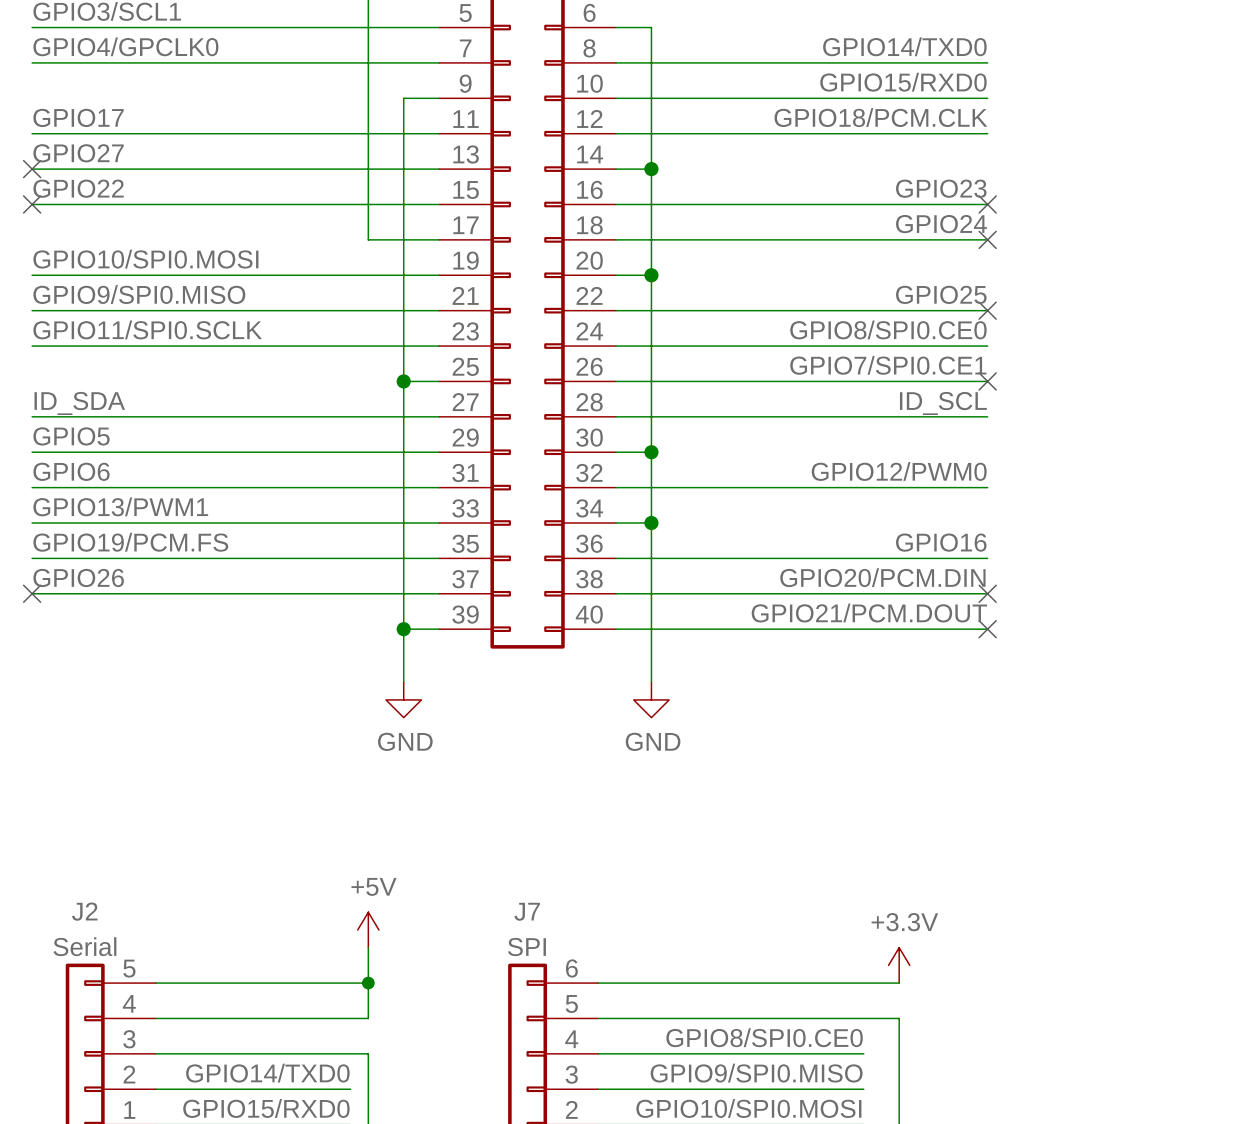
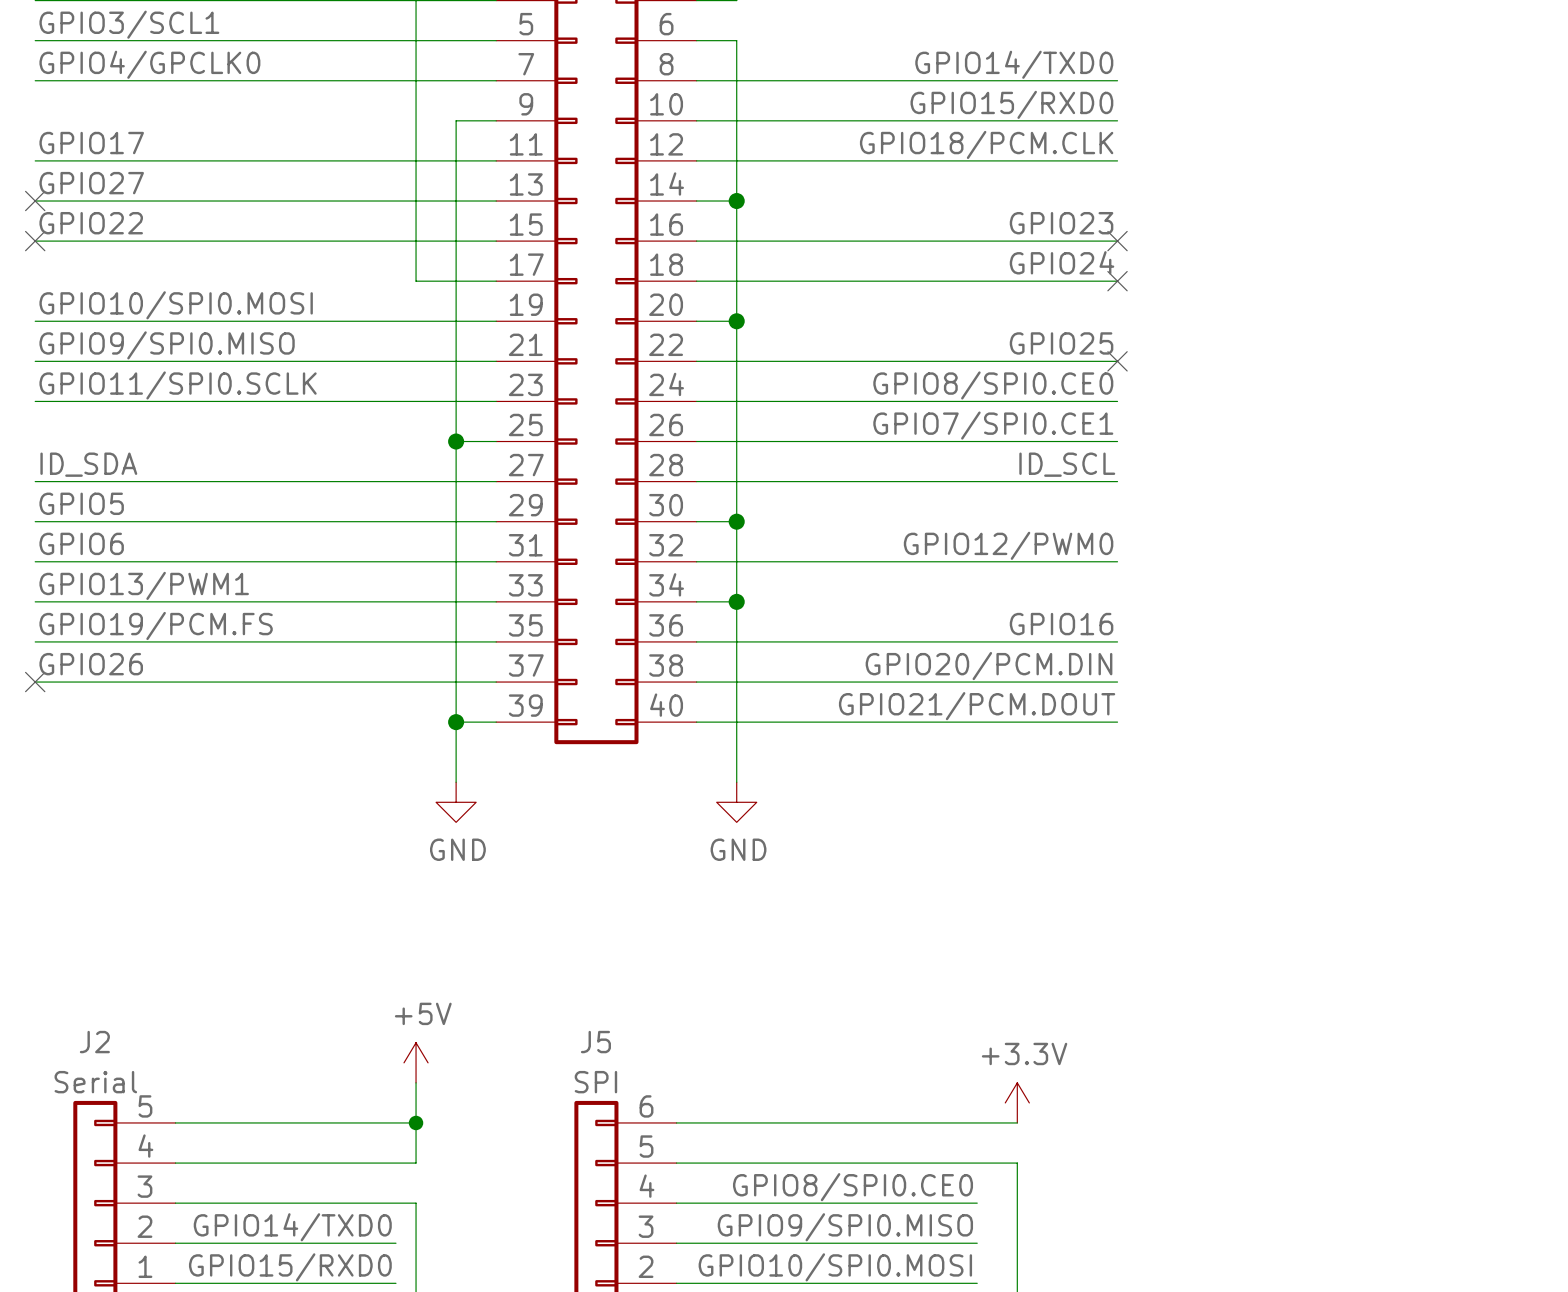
no-connect mark: (987, 381) -> none
no-connect mark: (987, 593) -> none
no-connect mark: (987, 629) -> none
J7 name: J7 (527, 911) -> J5 (595, 1042)

